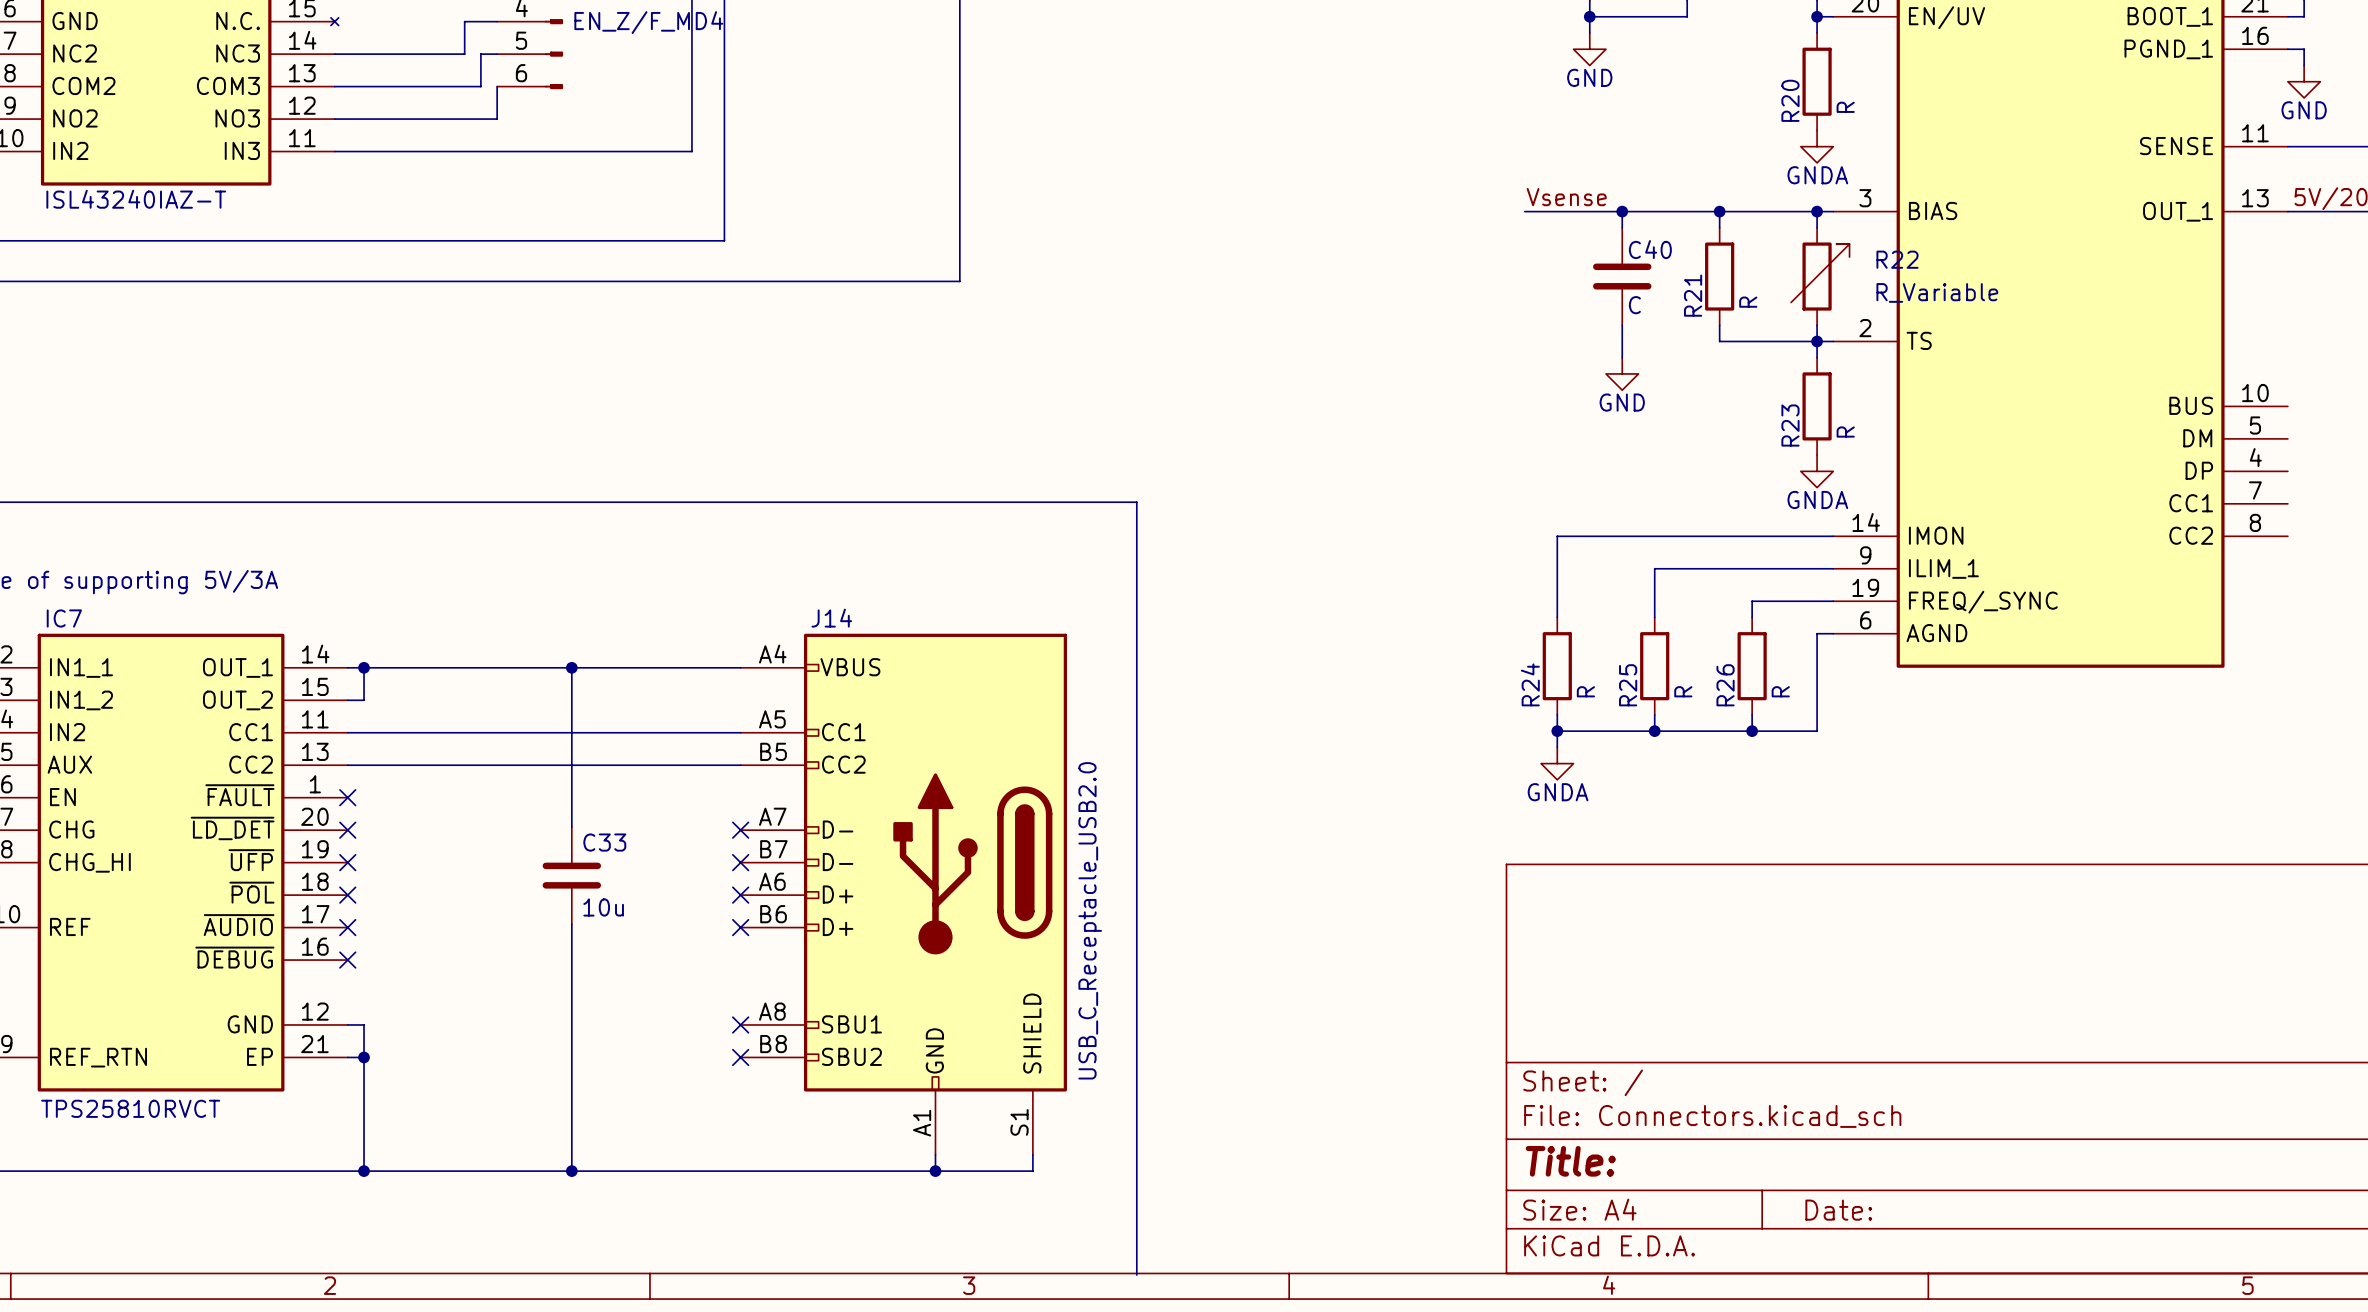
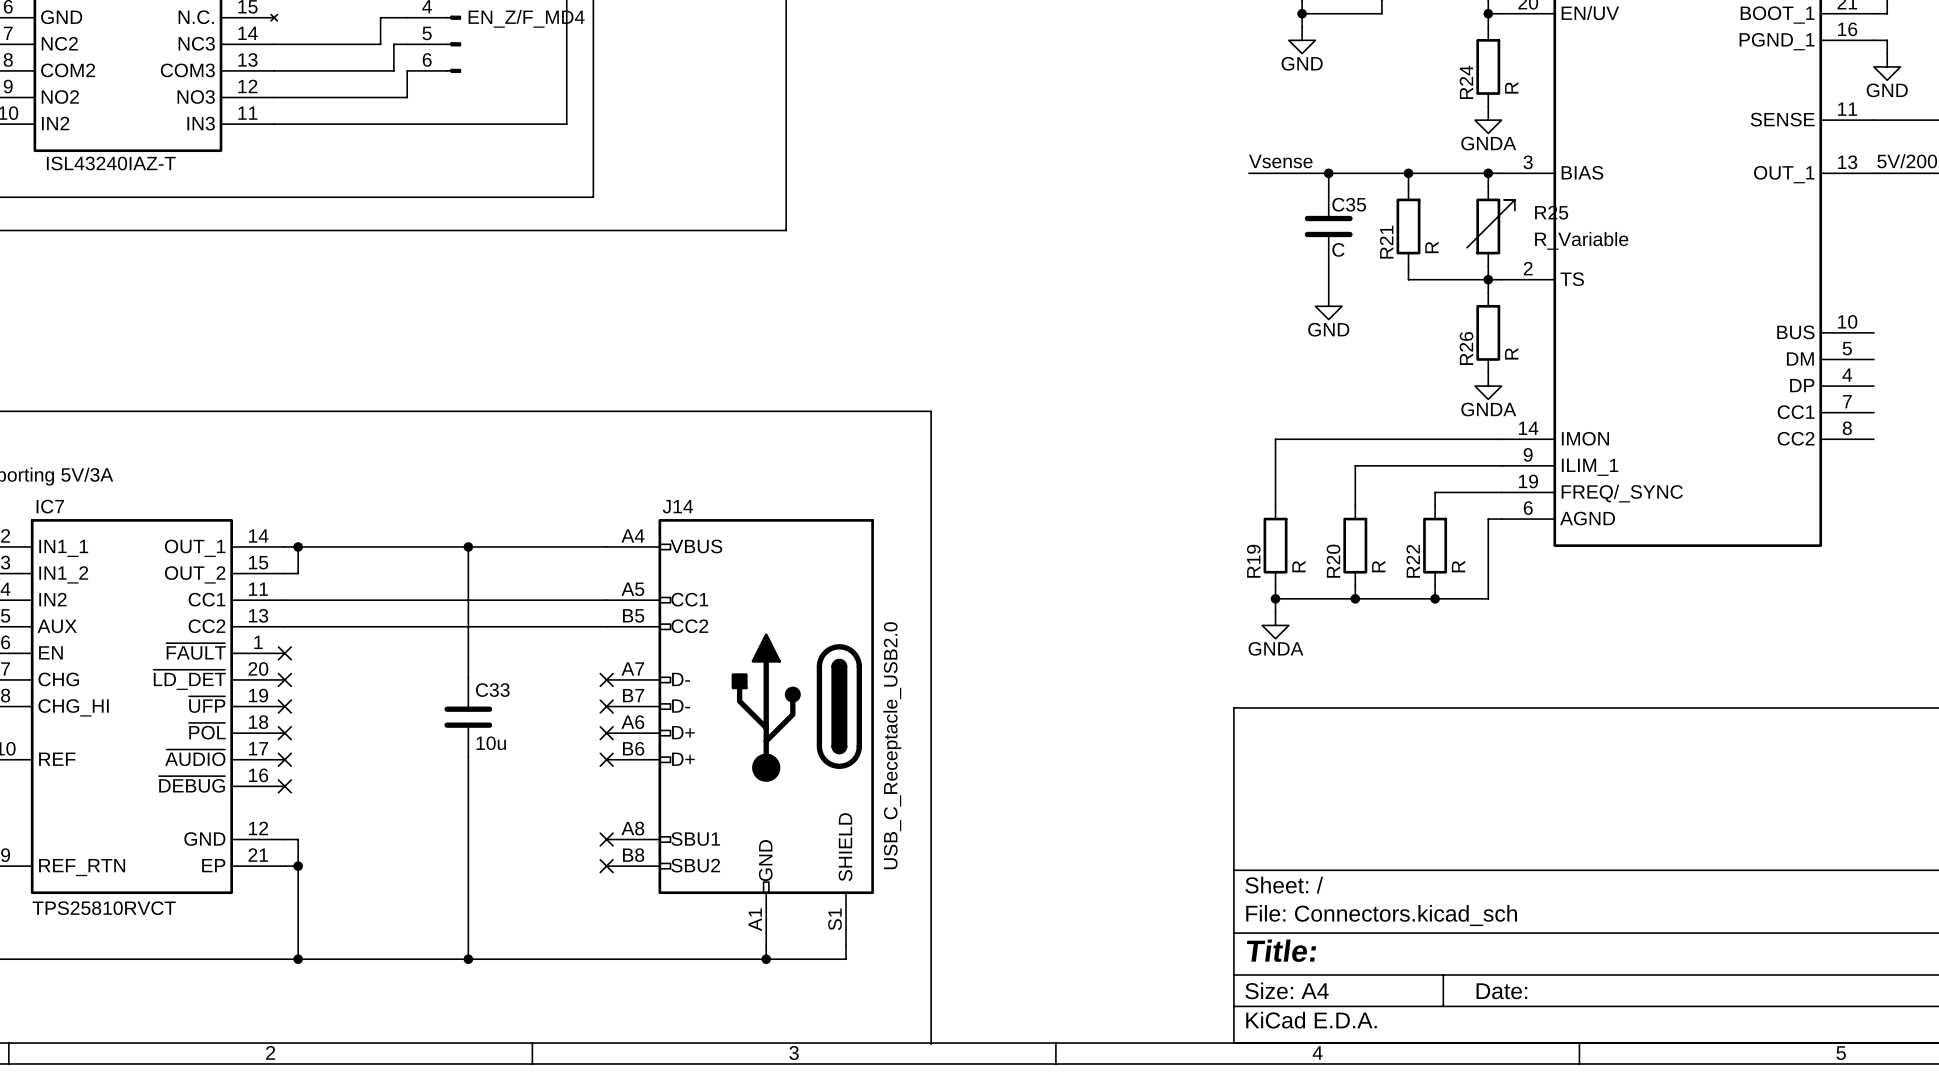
R20 name: R20 (1790, 100) -> R24 (1466, 82)
C40 name: C40 (1650, 249) -> C35 (1349, 204)
R22 name: R22 (1897, 259) -> R25 (1551, 212)
R23 name: R23 (1790, 425) -> R26 (1466, 348)
R24 name: R24 (1530, 684) -> R19 (1253, 561)
R25 name: R25 (1628, 685) -> R20 (1333, 561)
R26 name: R26 (1725, 685) -> R22 (1413, 561)

